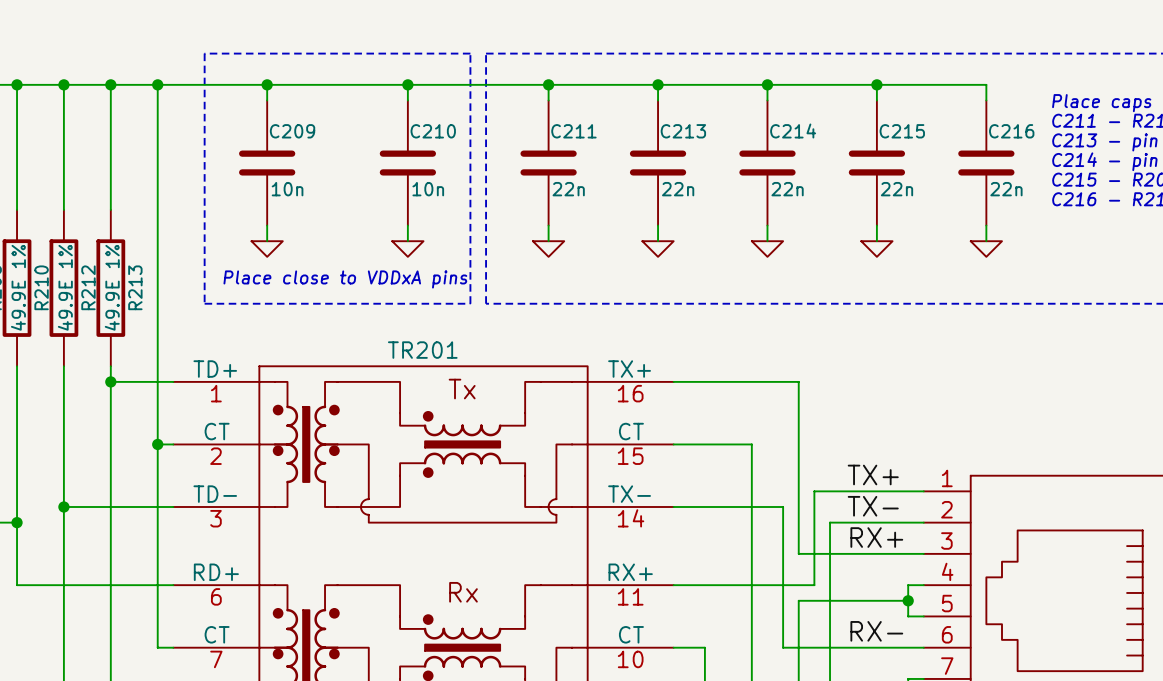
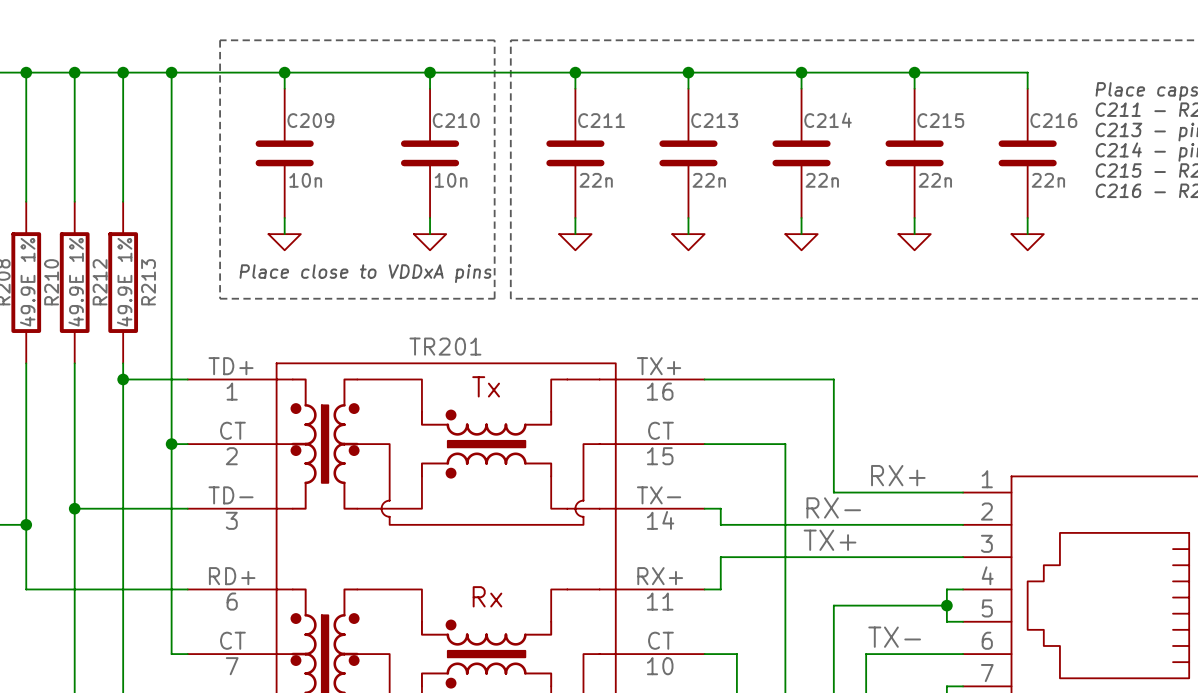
label position: TX+ (873, 474) -> TX+ (830, 540)
wire: (798, 491) (798, 553) -> (833, 492) (849, 492)
wire: (814, 491) (814, 585) (689, 585) -> (833, 557) (720, 557) (720, 589)
wire: (689, 506) (783, 506) (783, 647) (830, 647) (830, 522) -> (720, 508) (720, 524) (866, 524)
label position: TX- (873, 506) -> TX- (894, 637)
label position: RX+ (876, 537) -> RX+ (898, 475)
label position: RX- (876, 631) -> RX- (833, 507)

